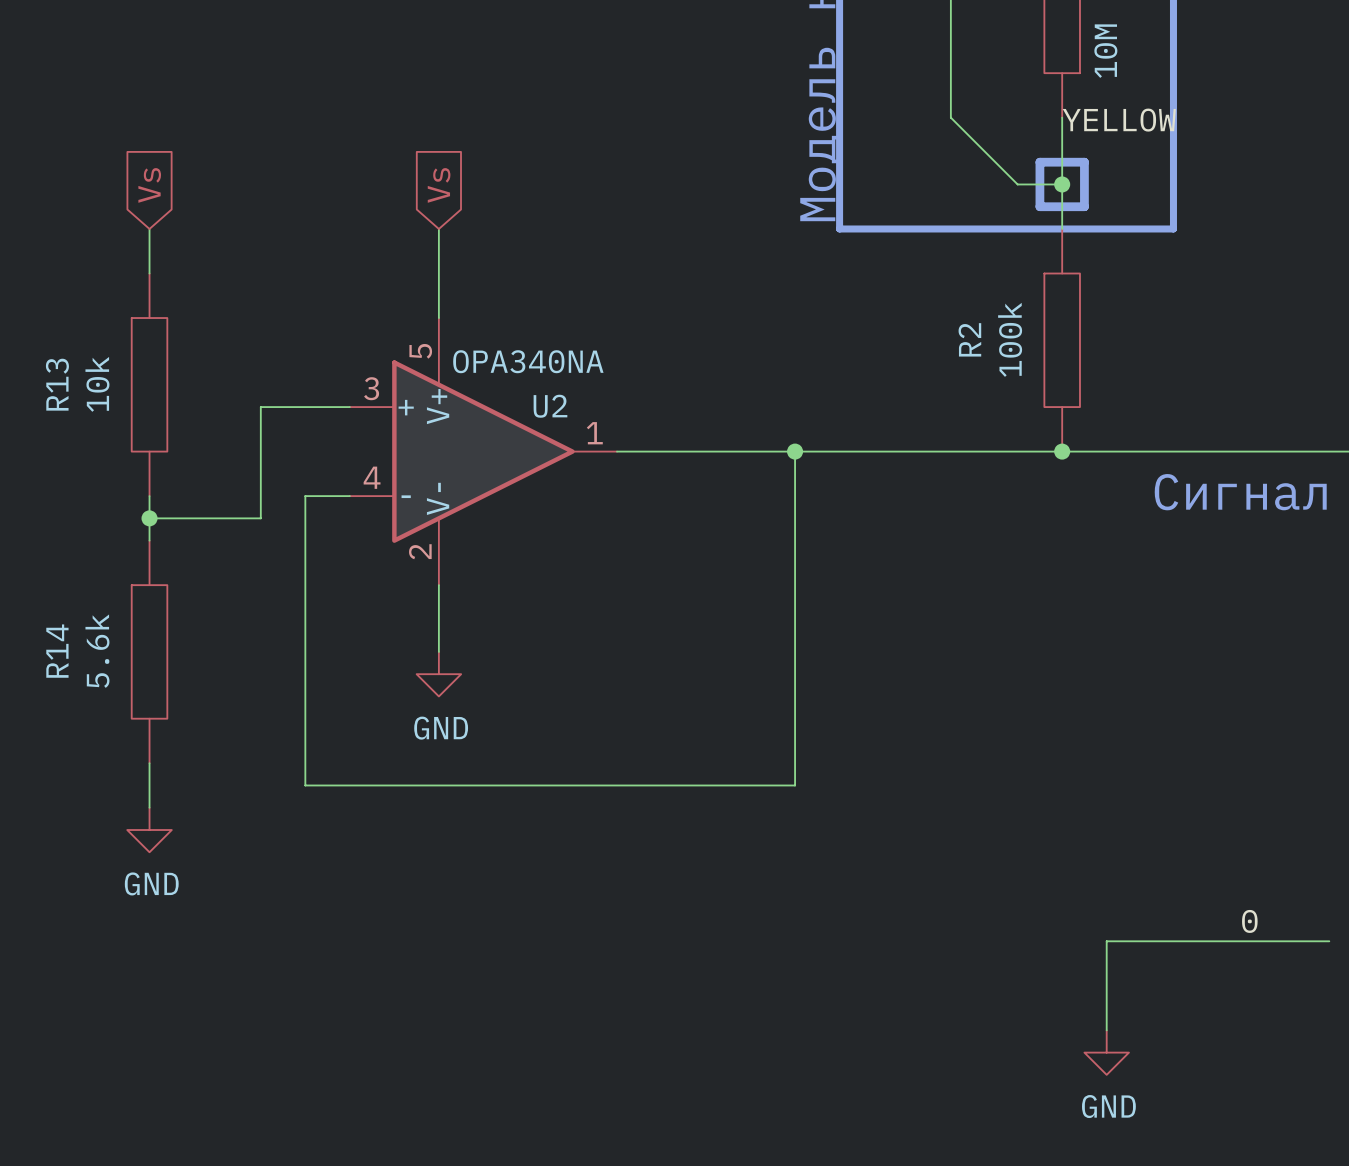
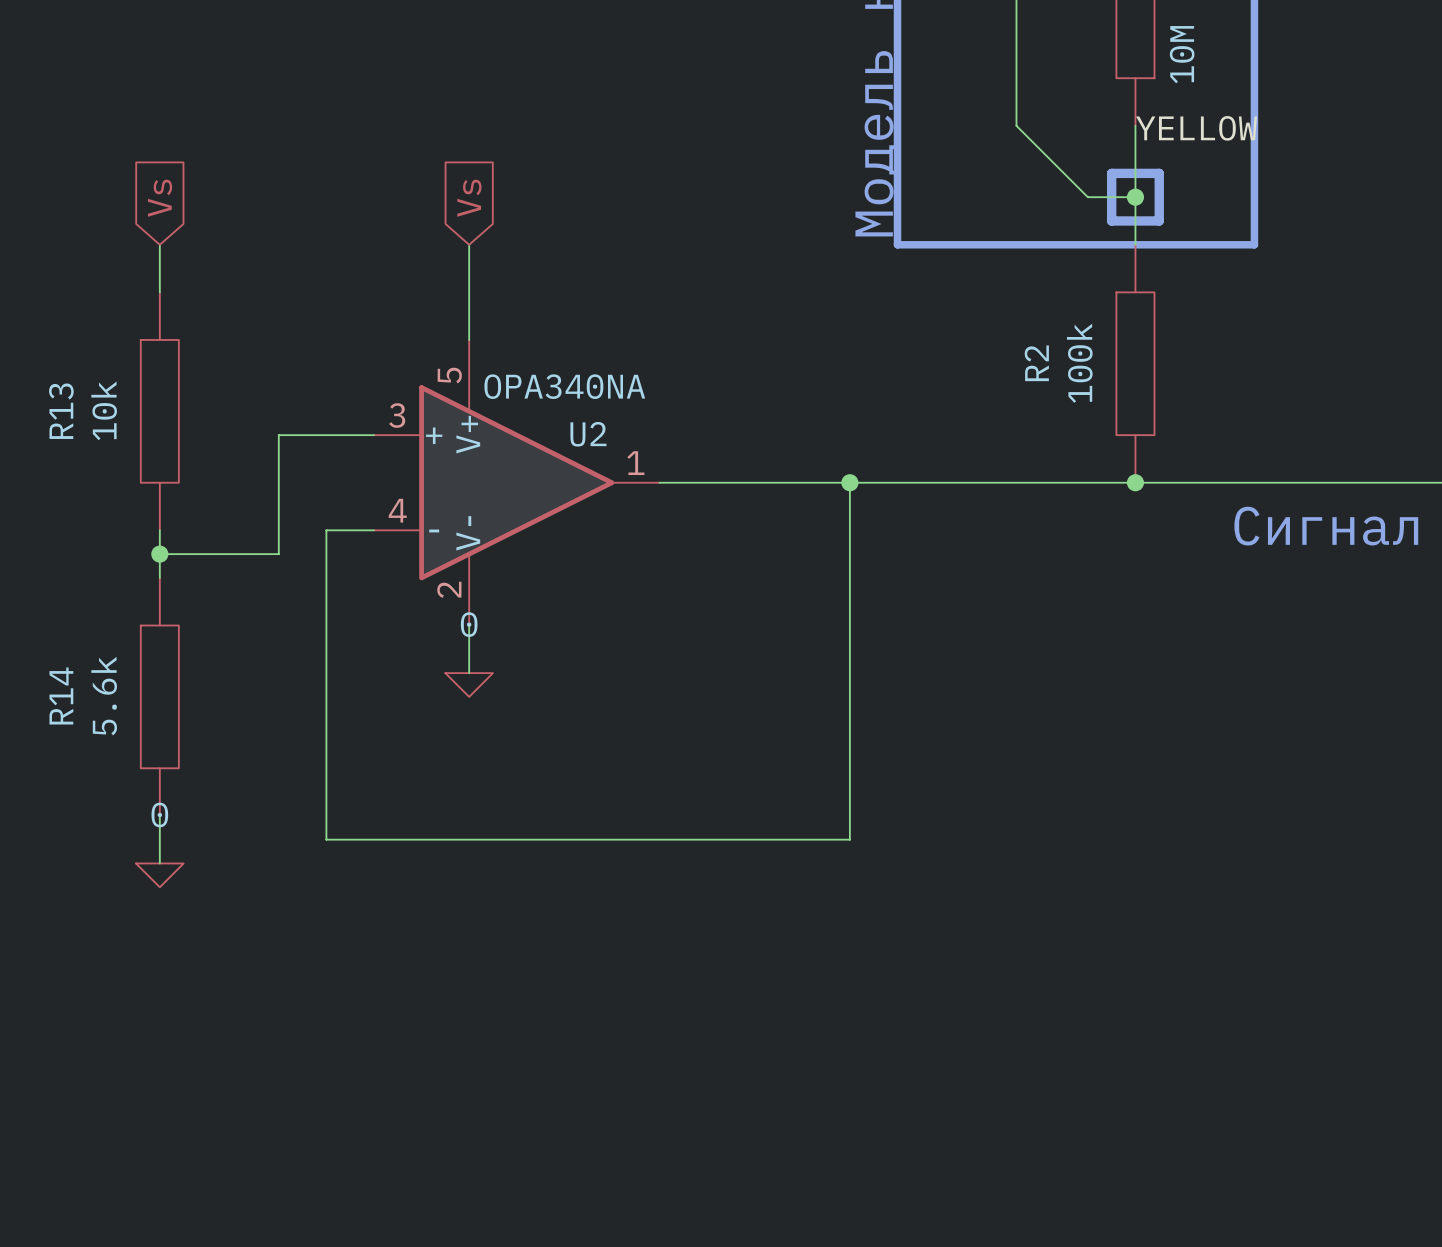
wire: (438, 629) (438, 651) -> none
power symbol: none -> 0 (469, 685)
power symbol: GND (438, 674) -> none
power symbol: GND (149, 830) -> 0 (159, 875)
label: 0 (1249, 921) -> none
wire: (1329, 941) (1106, 941) (1106, 1030) -> none
power symbol: GND (1106, 1052) -> none

